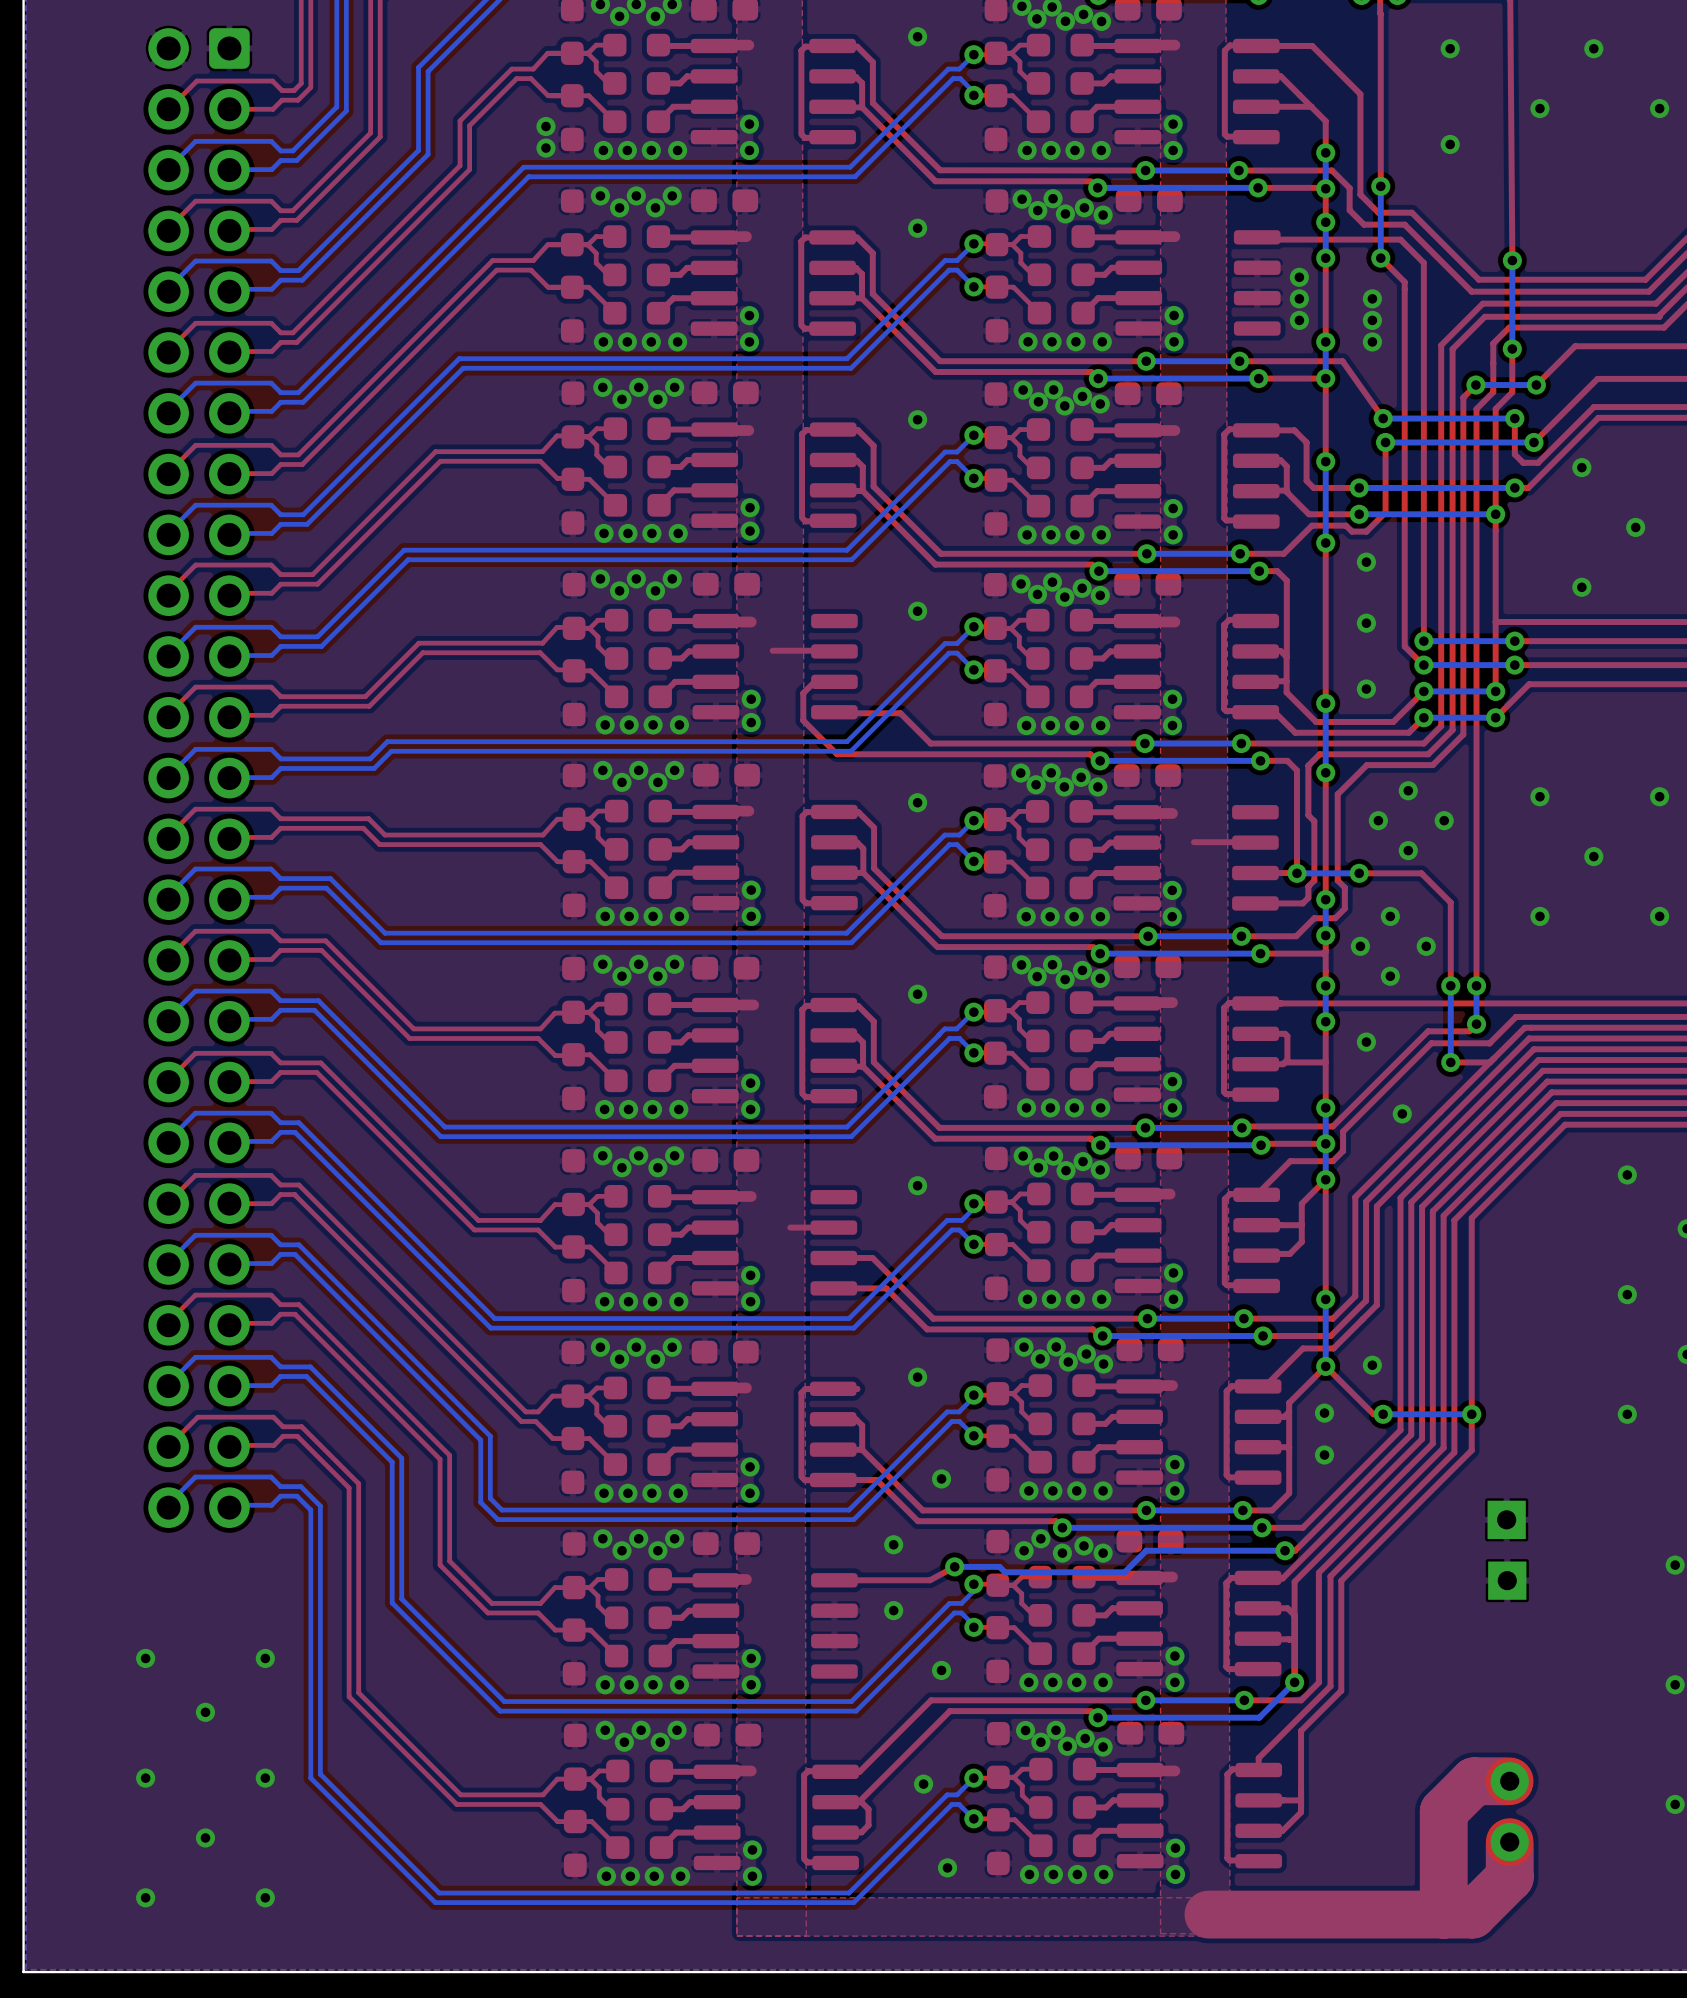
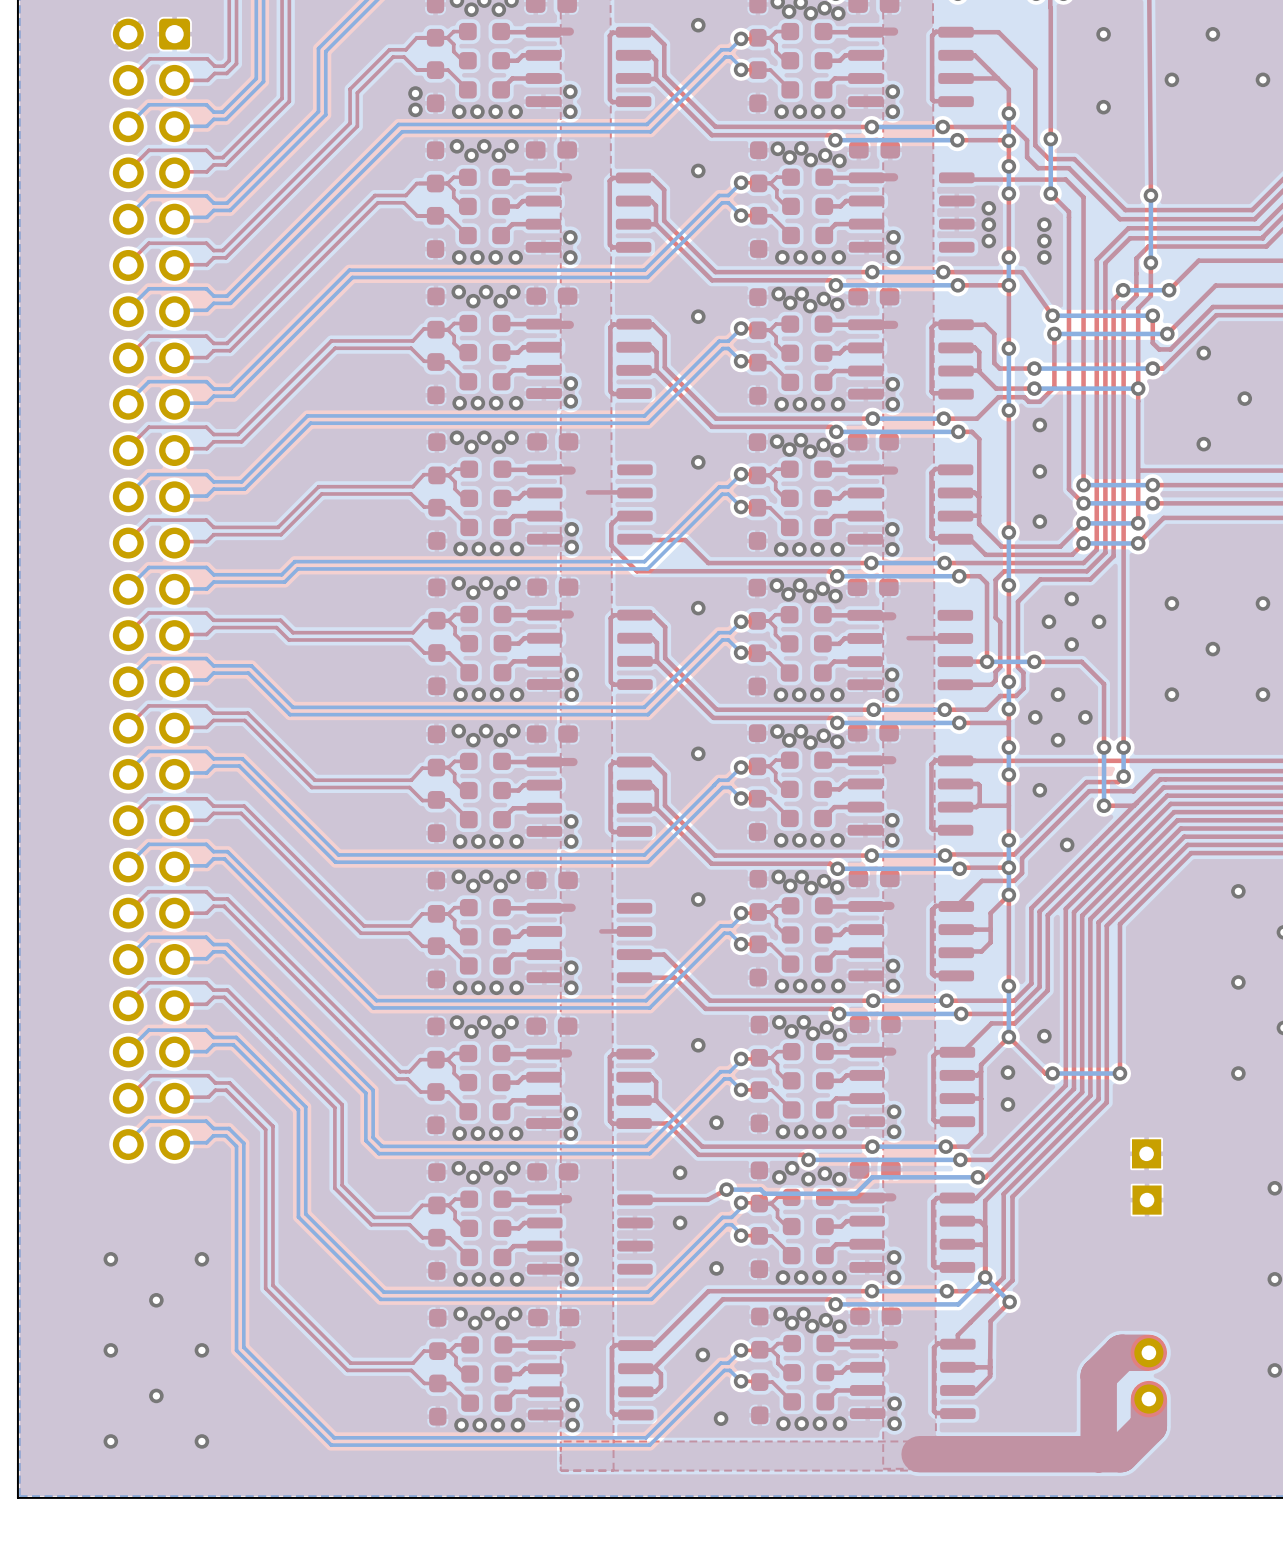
top track: (1471, 1414) (1471, 1450) (1341, 1580) (1341, 1690) (1301, 1730) (1301, 1790) -> none
bottom track: none -> (985, 1277) (1009, 1301)
top track: none -> (1009, 1301) (990, 1321) (990, 1367)
via: none -> (1009, 1301)

